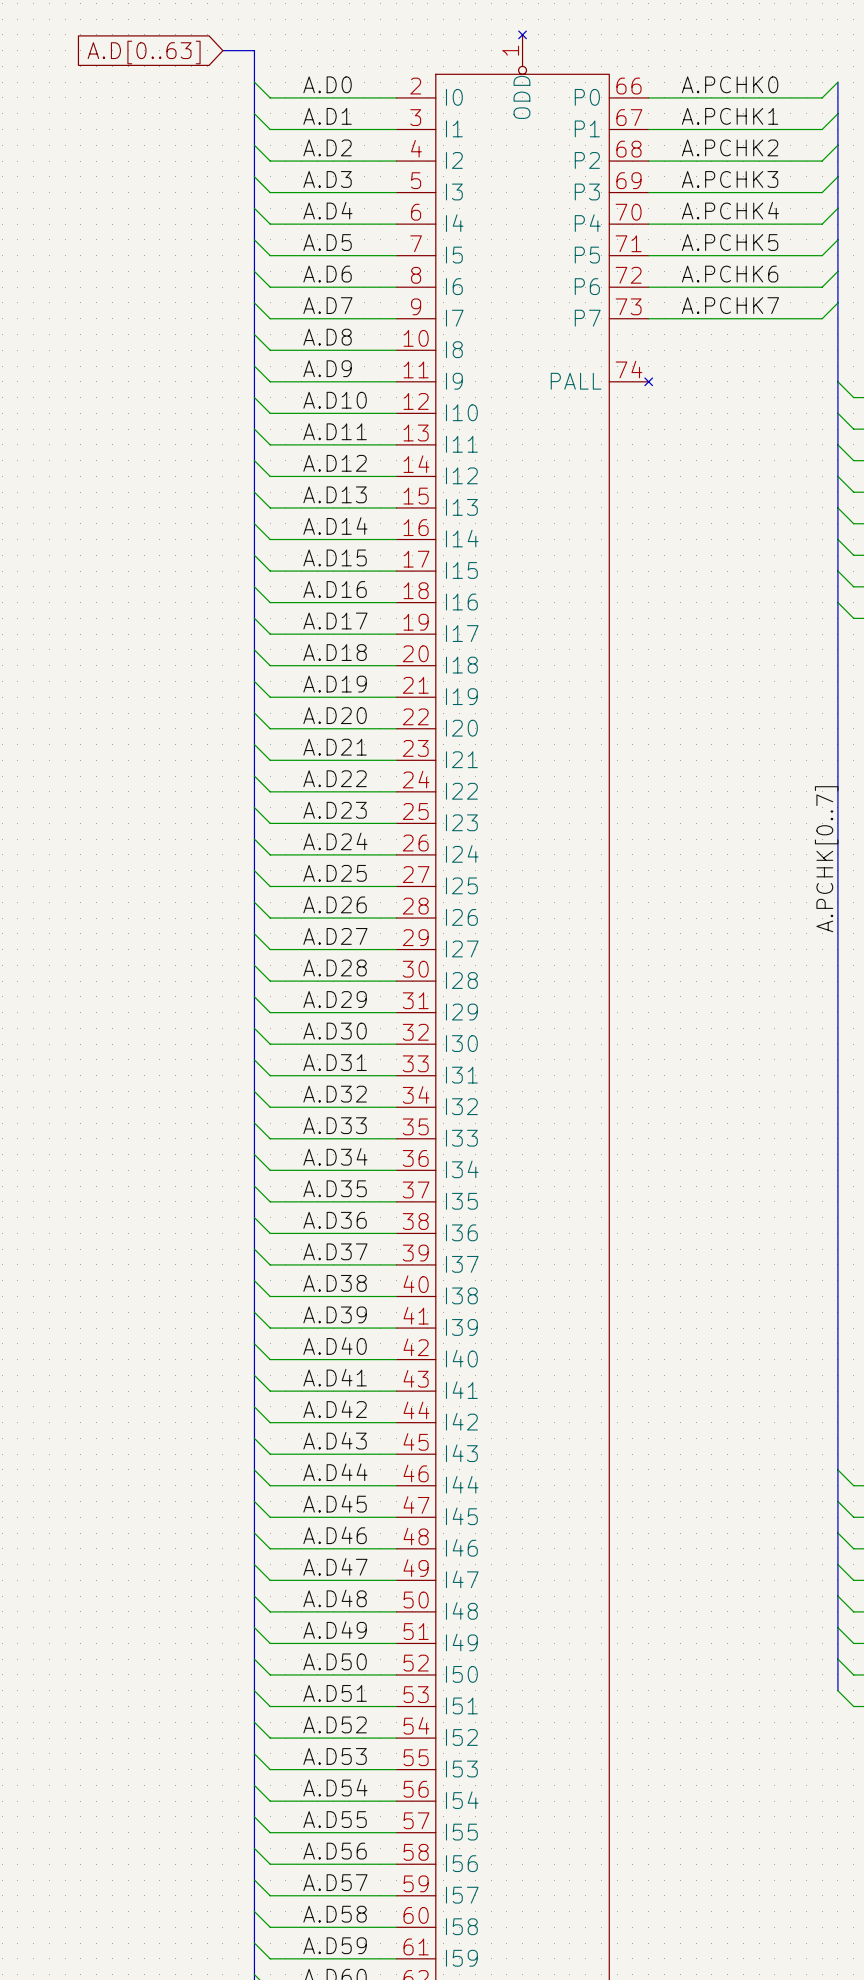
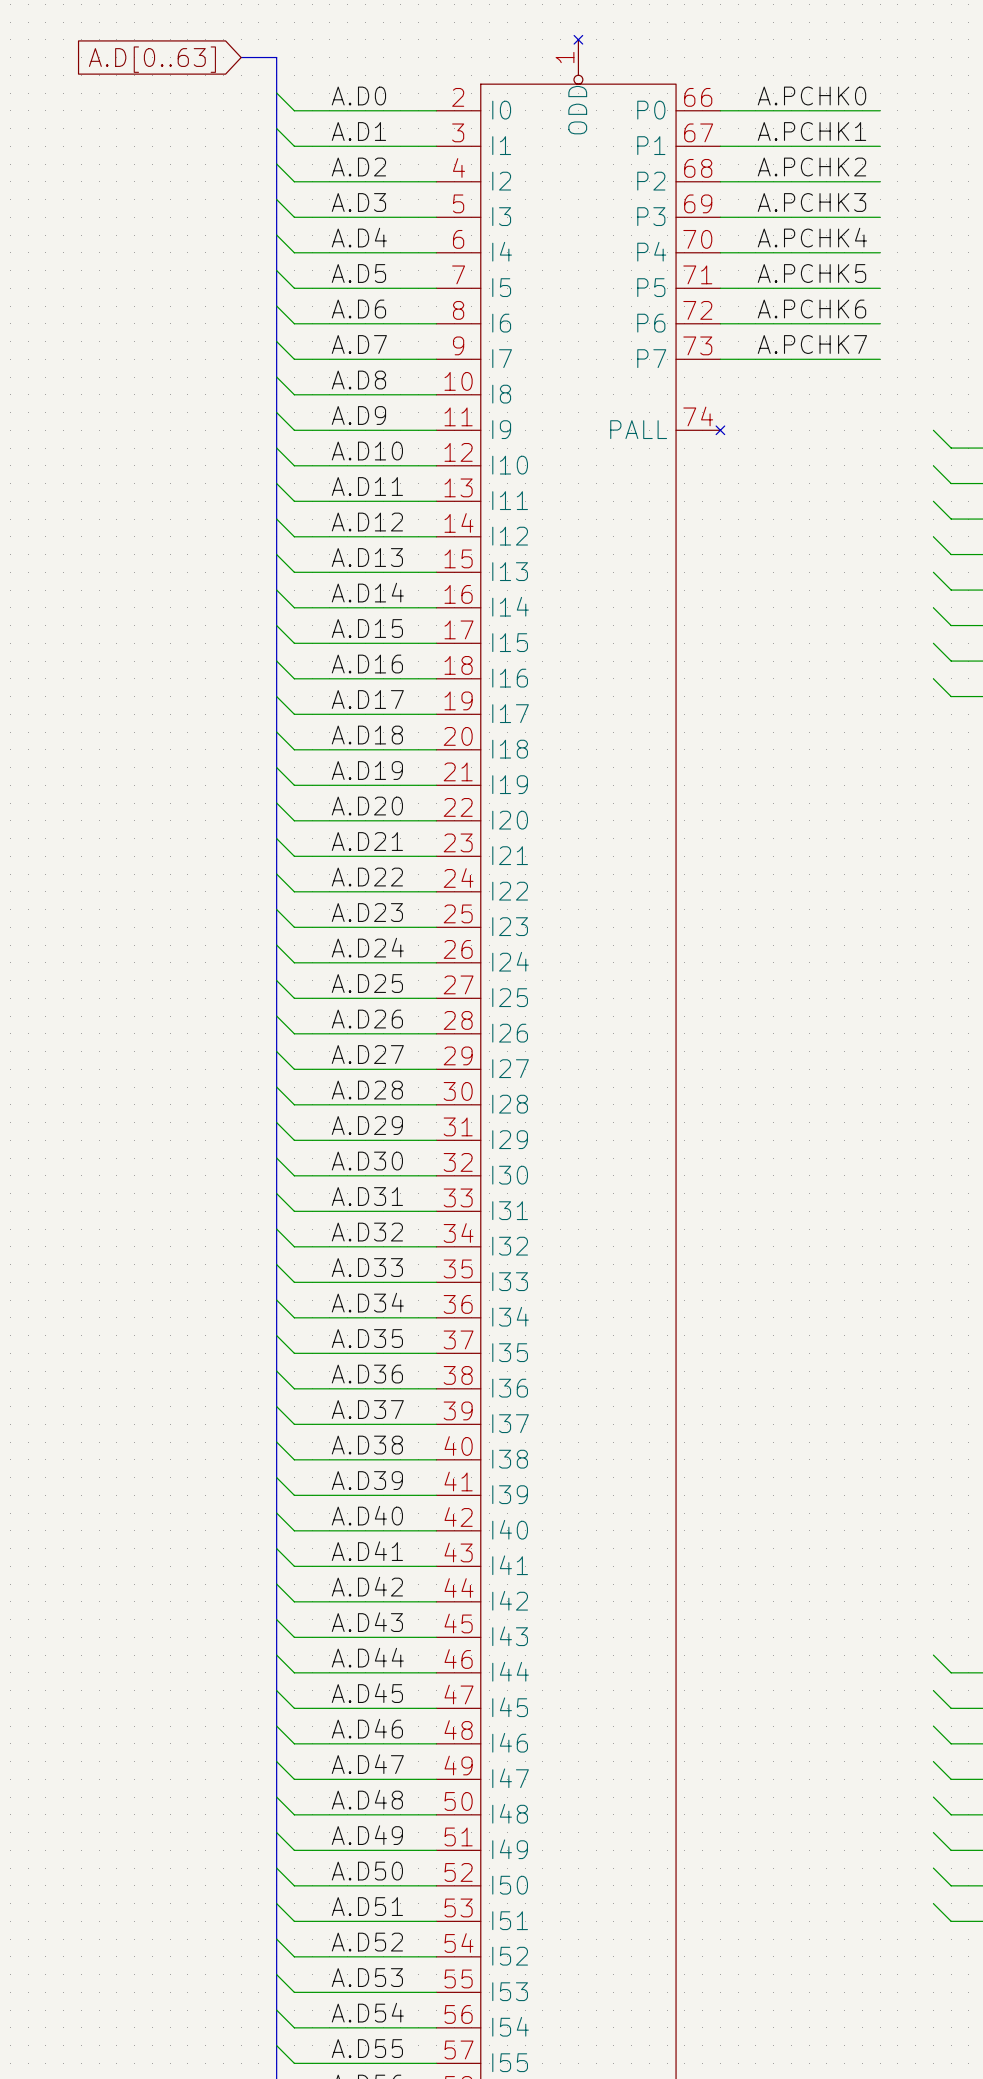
bus: (837, 82) (837, 1690) -> none
wire: (837, 82) (822, 97) (790, 97) -> none
wire: (837, 113) (822, 129) (790, 129) -> none
wire: (837, 145) (822, 161) (790, 161) -> none
wire: (837, 176) (822, 192) (790, 192) -> none
wire: (837, 208) (822, 224) (790, 224) -> none
wire: (837, 239) (822, 255) (790, 255) -> none
wire: (837, 271) (822, 287) (790, 287) -> none
wire: (837, 302) (822, 318) (790, 318) -> none
label: A.PCHK[0..7] (826, 859) -> none

